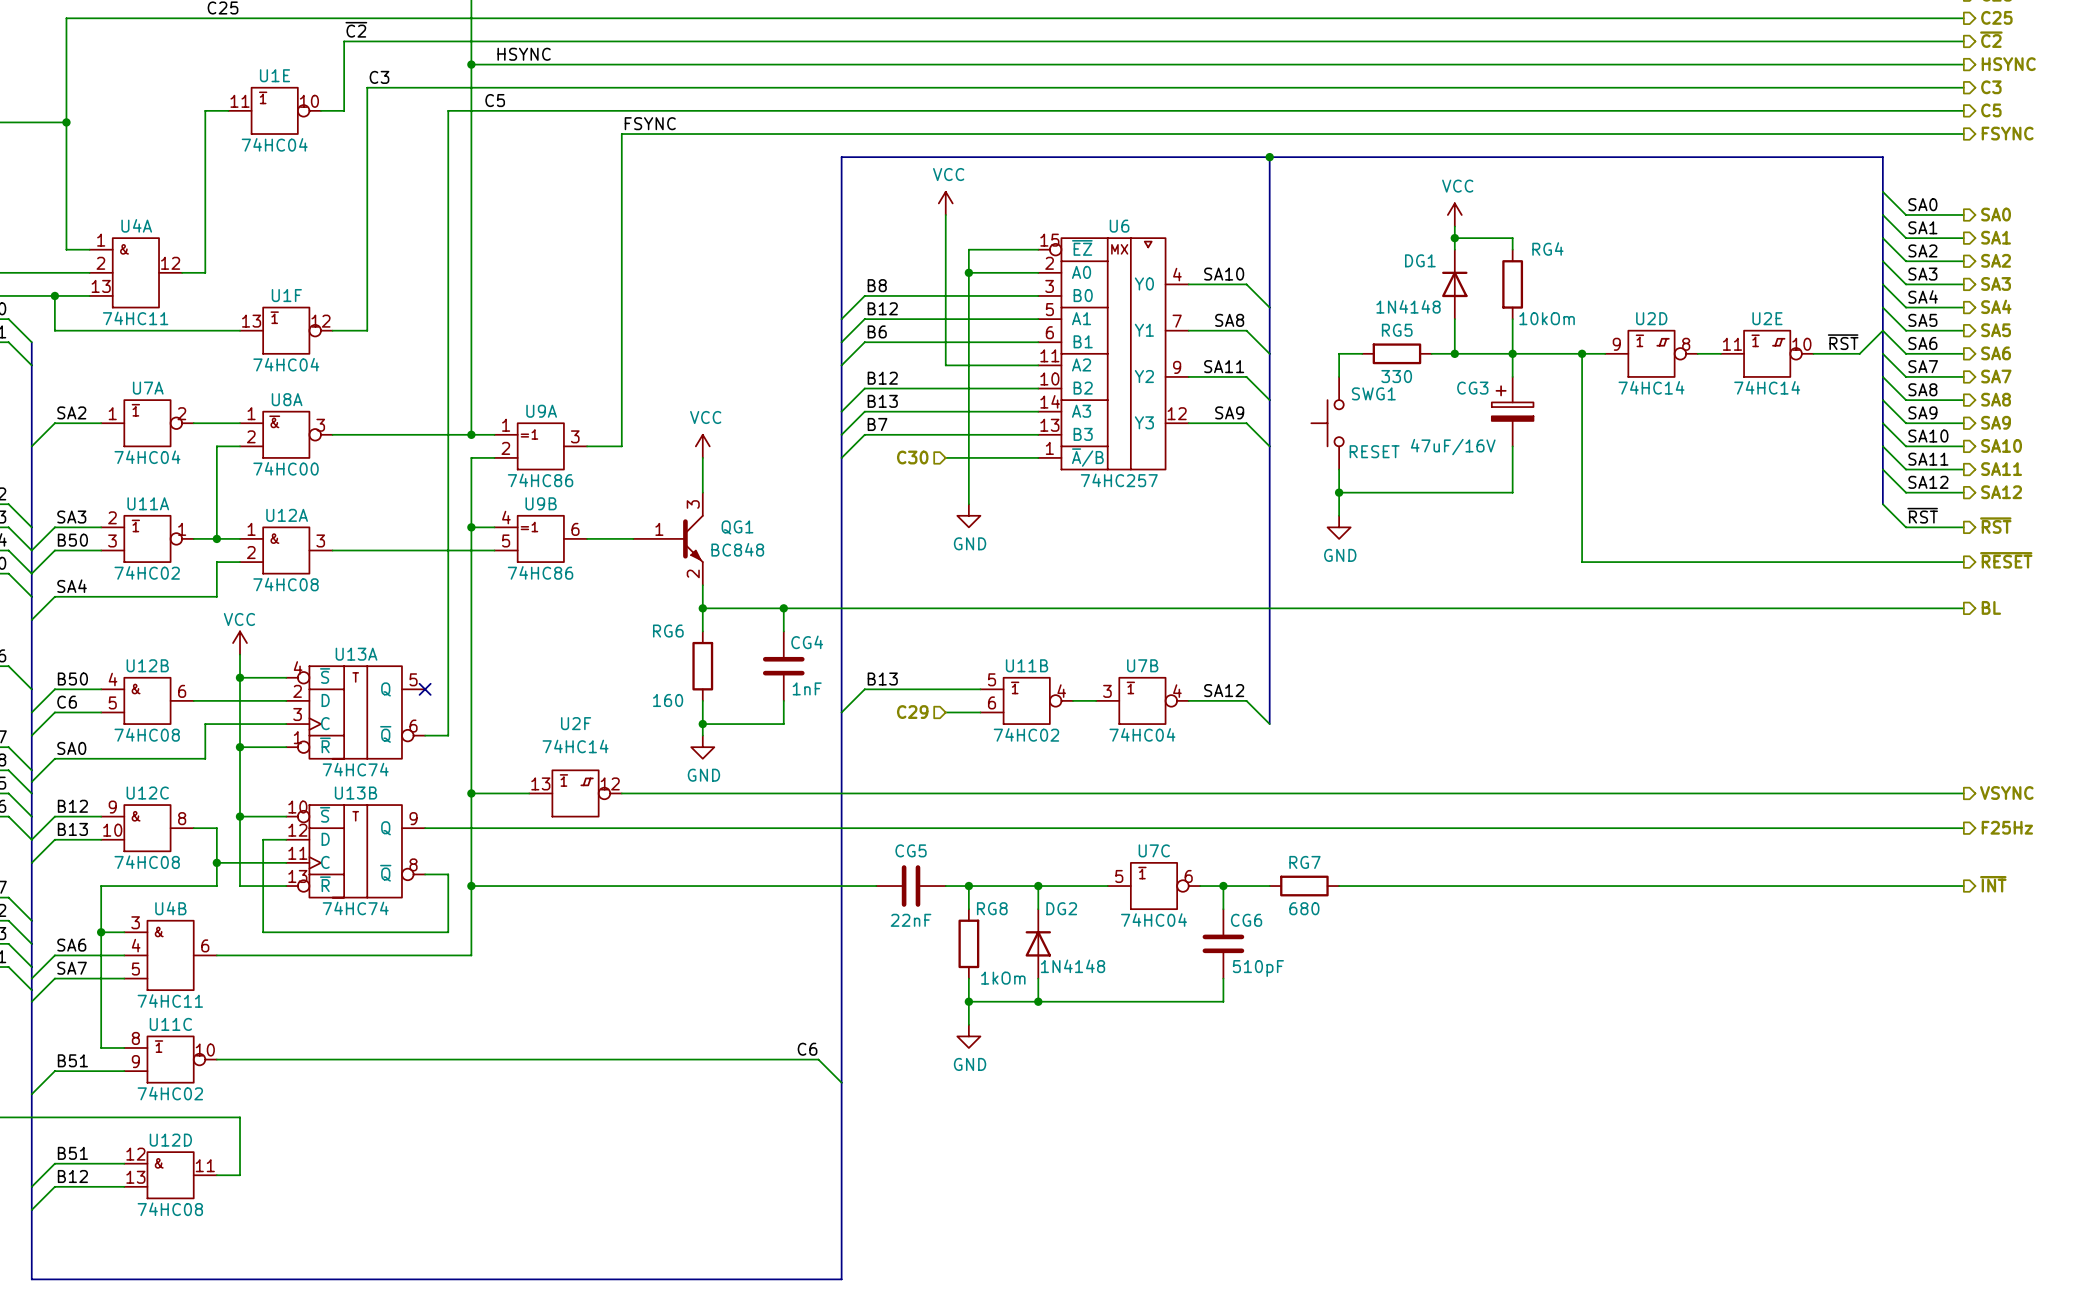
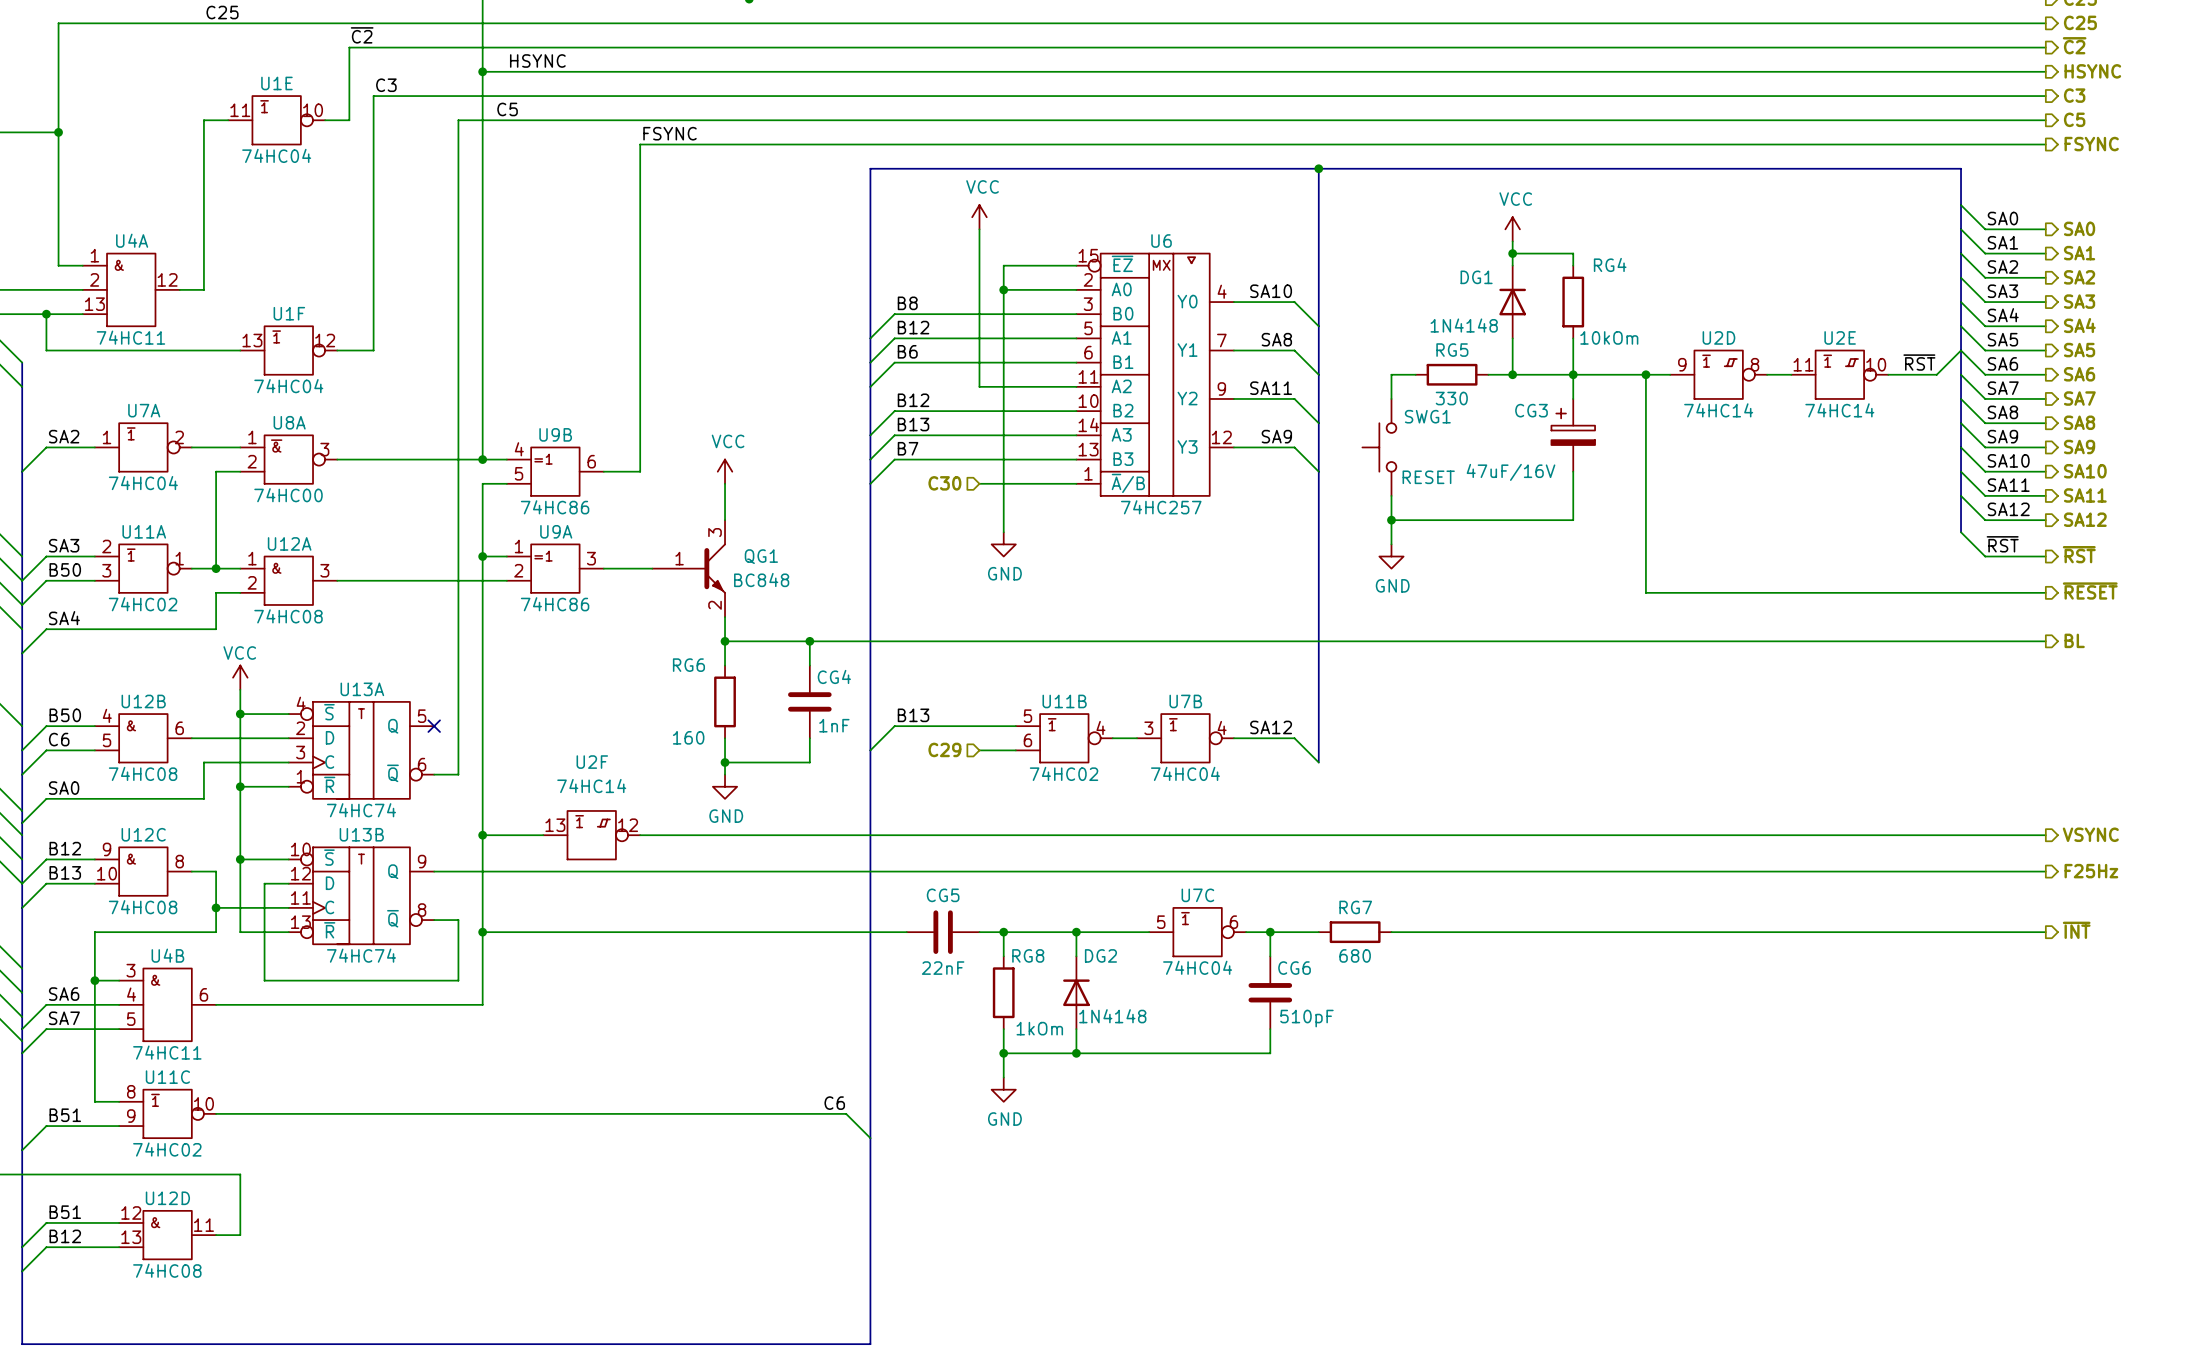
U9A position: (540, 446) -> (555, 568)
U9B position: (540, 538) -> (555, 471)

